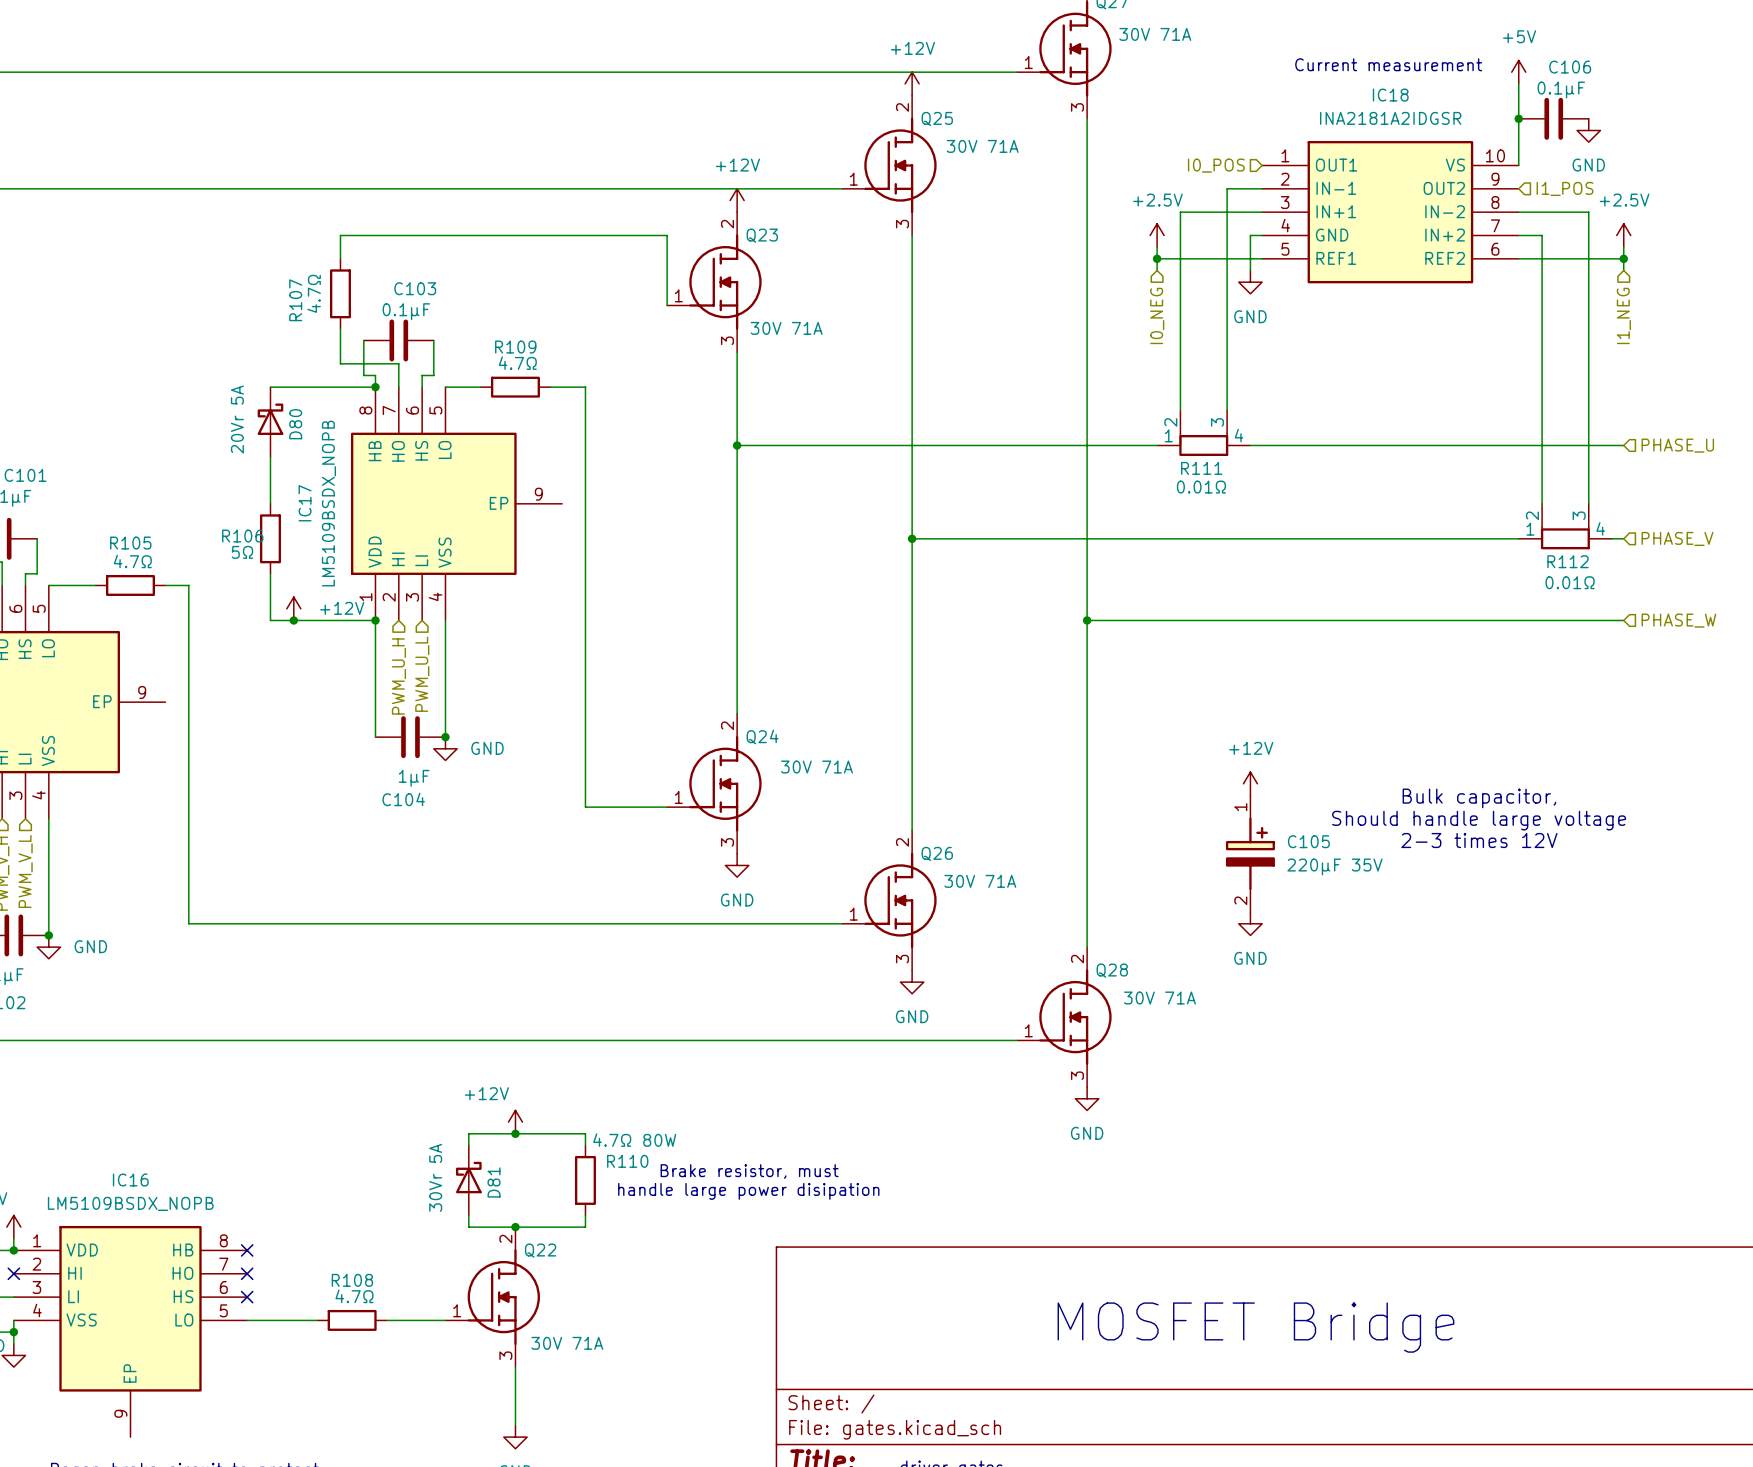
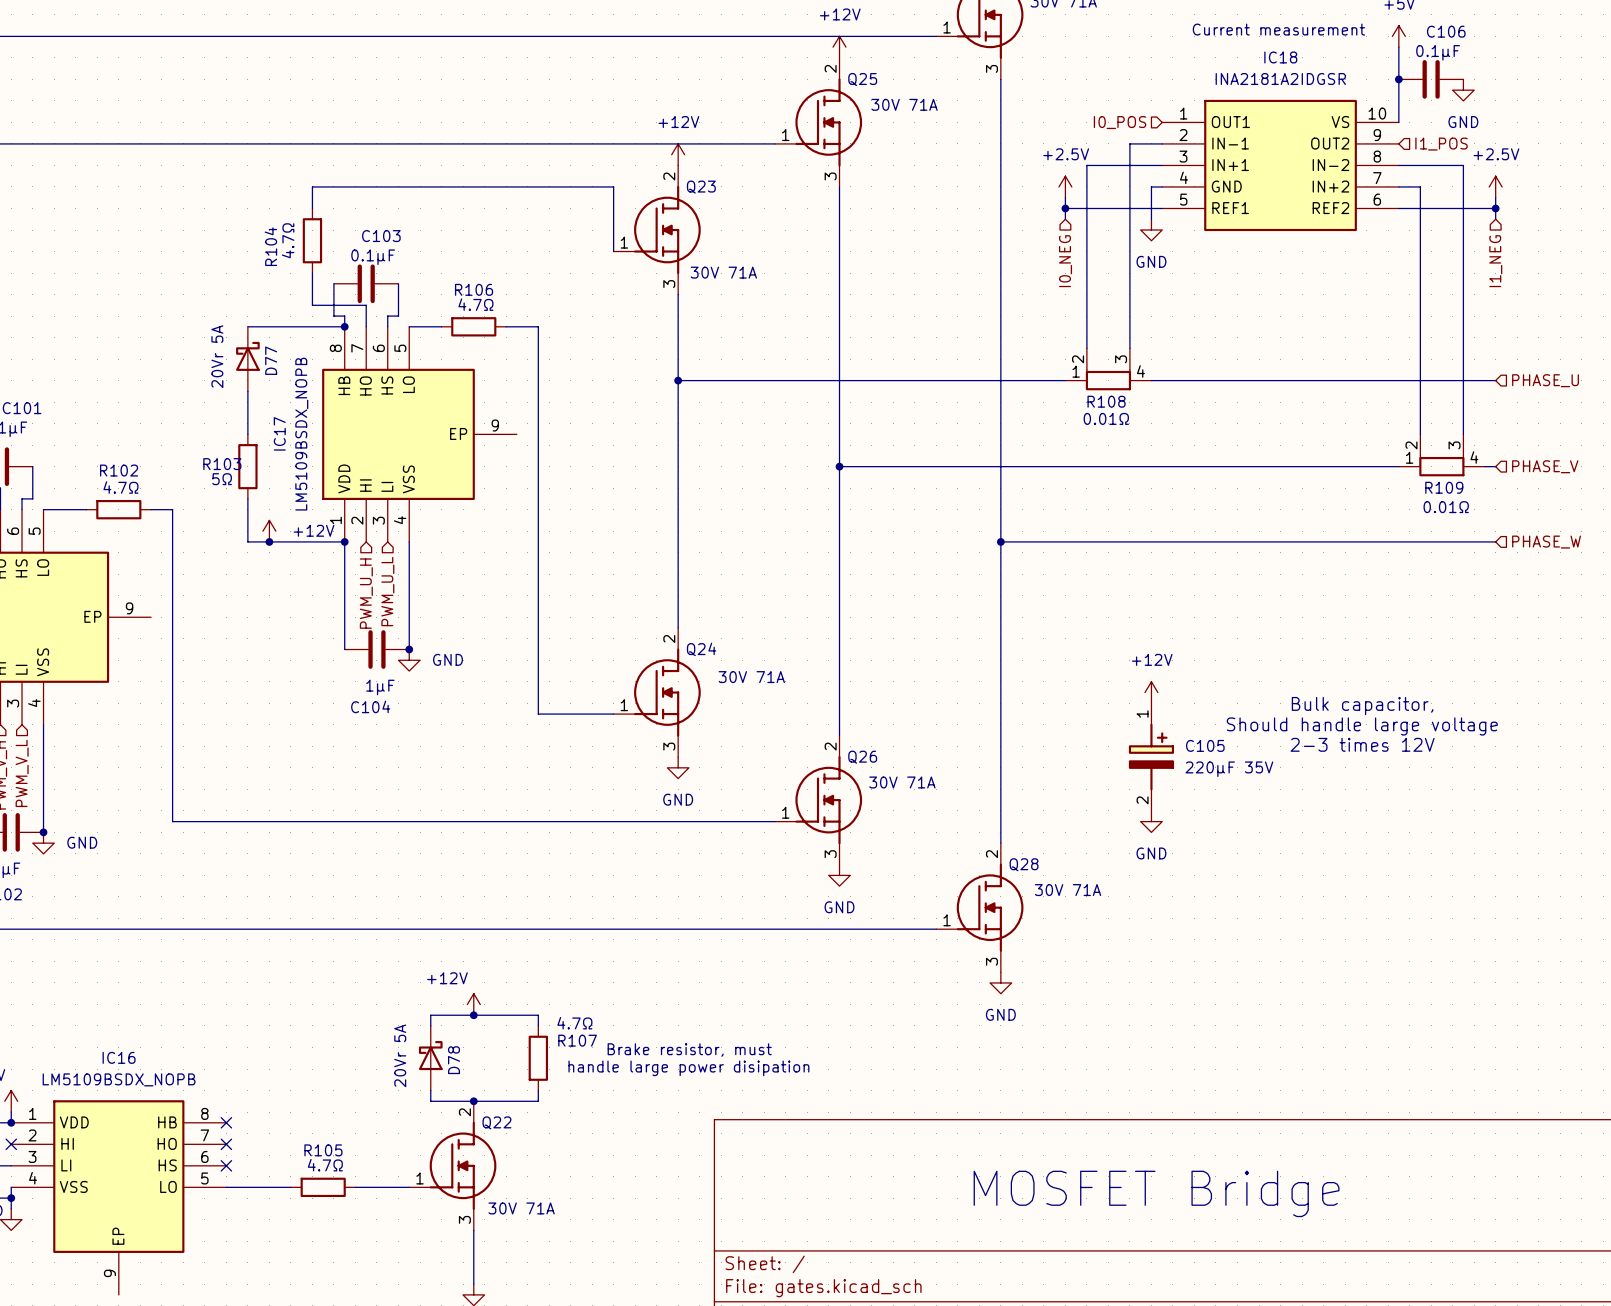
R107 name: R107 (295, 300) -> R104 (270, 246)
R109 name: R109 (515, 347) -> R106 (474, 289)
D80 name: D80 (295, 424) -> D77 (271, 360)
R111 name: R111 (1201, 468) -> R108 (1106, 401)
R106 name: R106 (242, 536) -> R103 (222, 464)
R105 name: R105 (130, 543) -> R102 (119, 470)
R112 name: R112 (1568, 561) -> R109 (1444, 487)
R110 value: 4.7Ω 80W (634, 1140) -> 4.7Ω (574, 1023)
R110 name: R110 (627, 1161) -> R107 (577, 1040)
D81 value: 30Vr 5A (435, 1177) -> 20Vr 5A (400, 1055)
D81 name: D81 (494, 1182) -> D78 (454, 1060)
R108 name: R108 (352, 1280) -> R105 (323, 1150)

